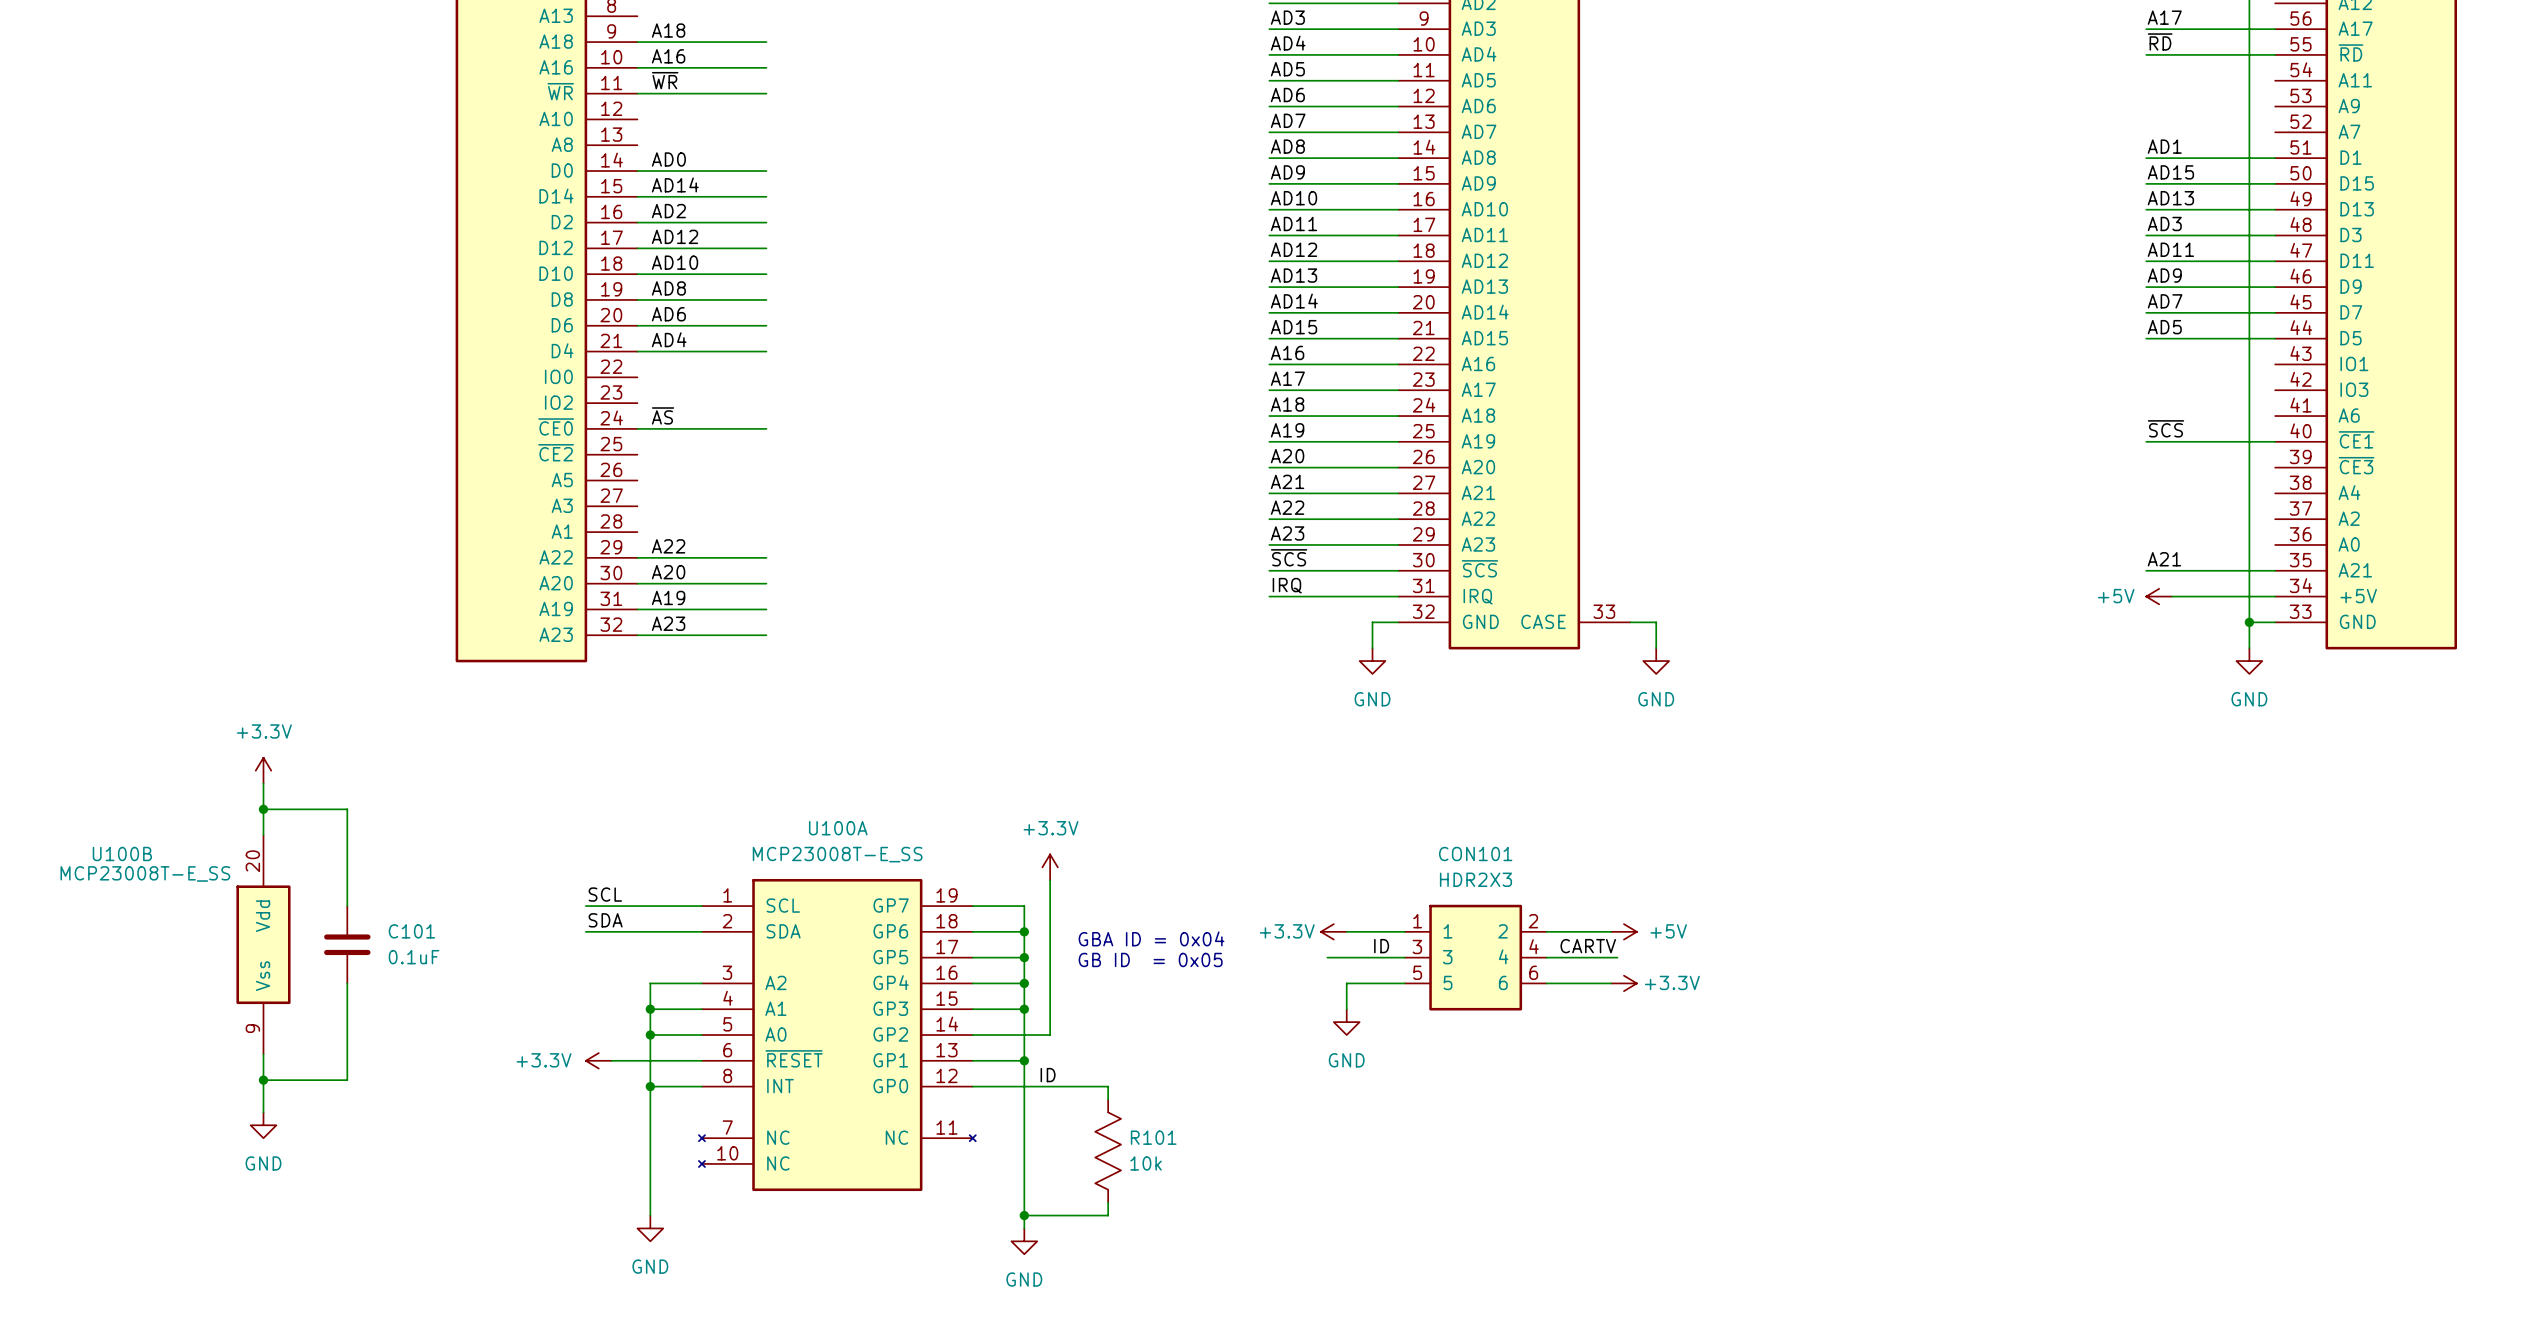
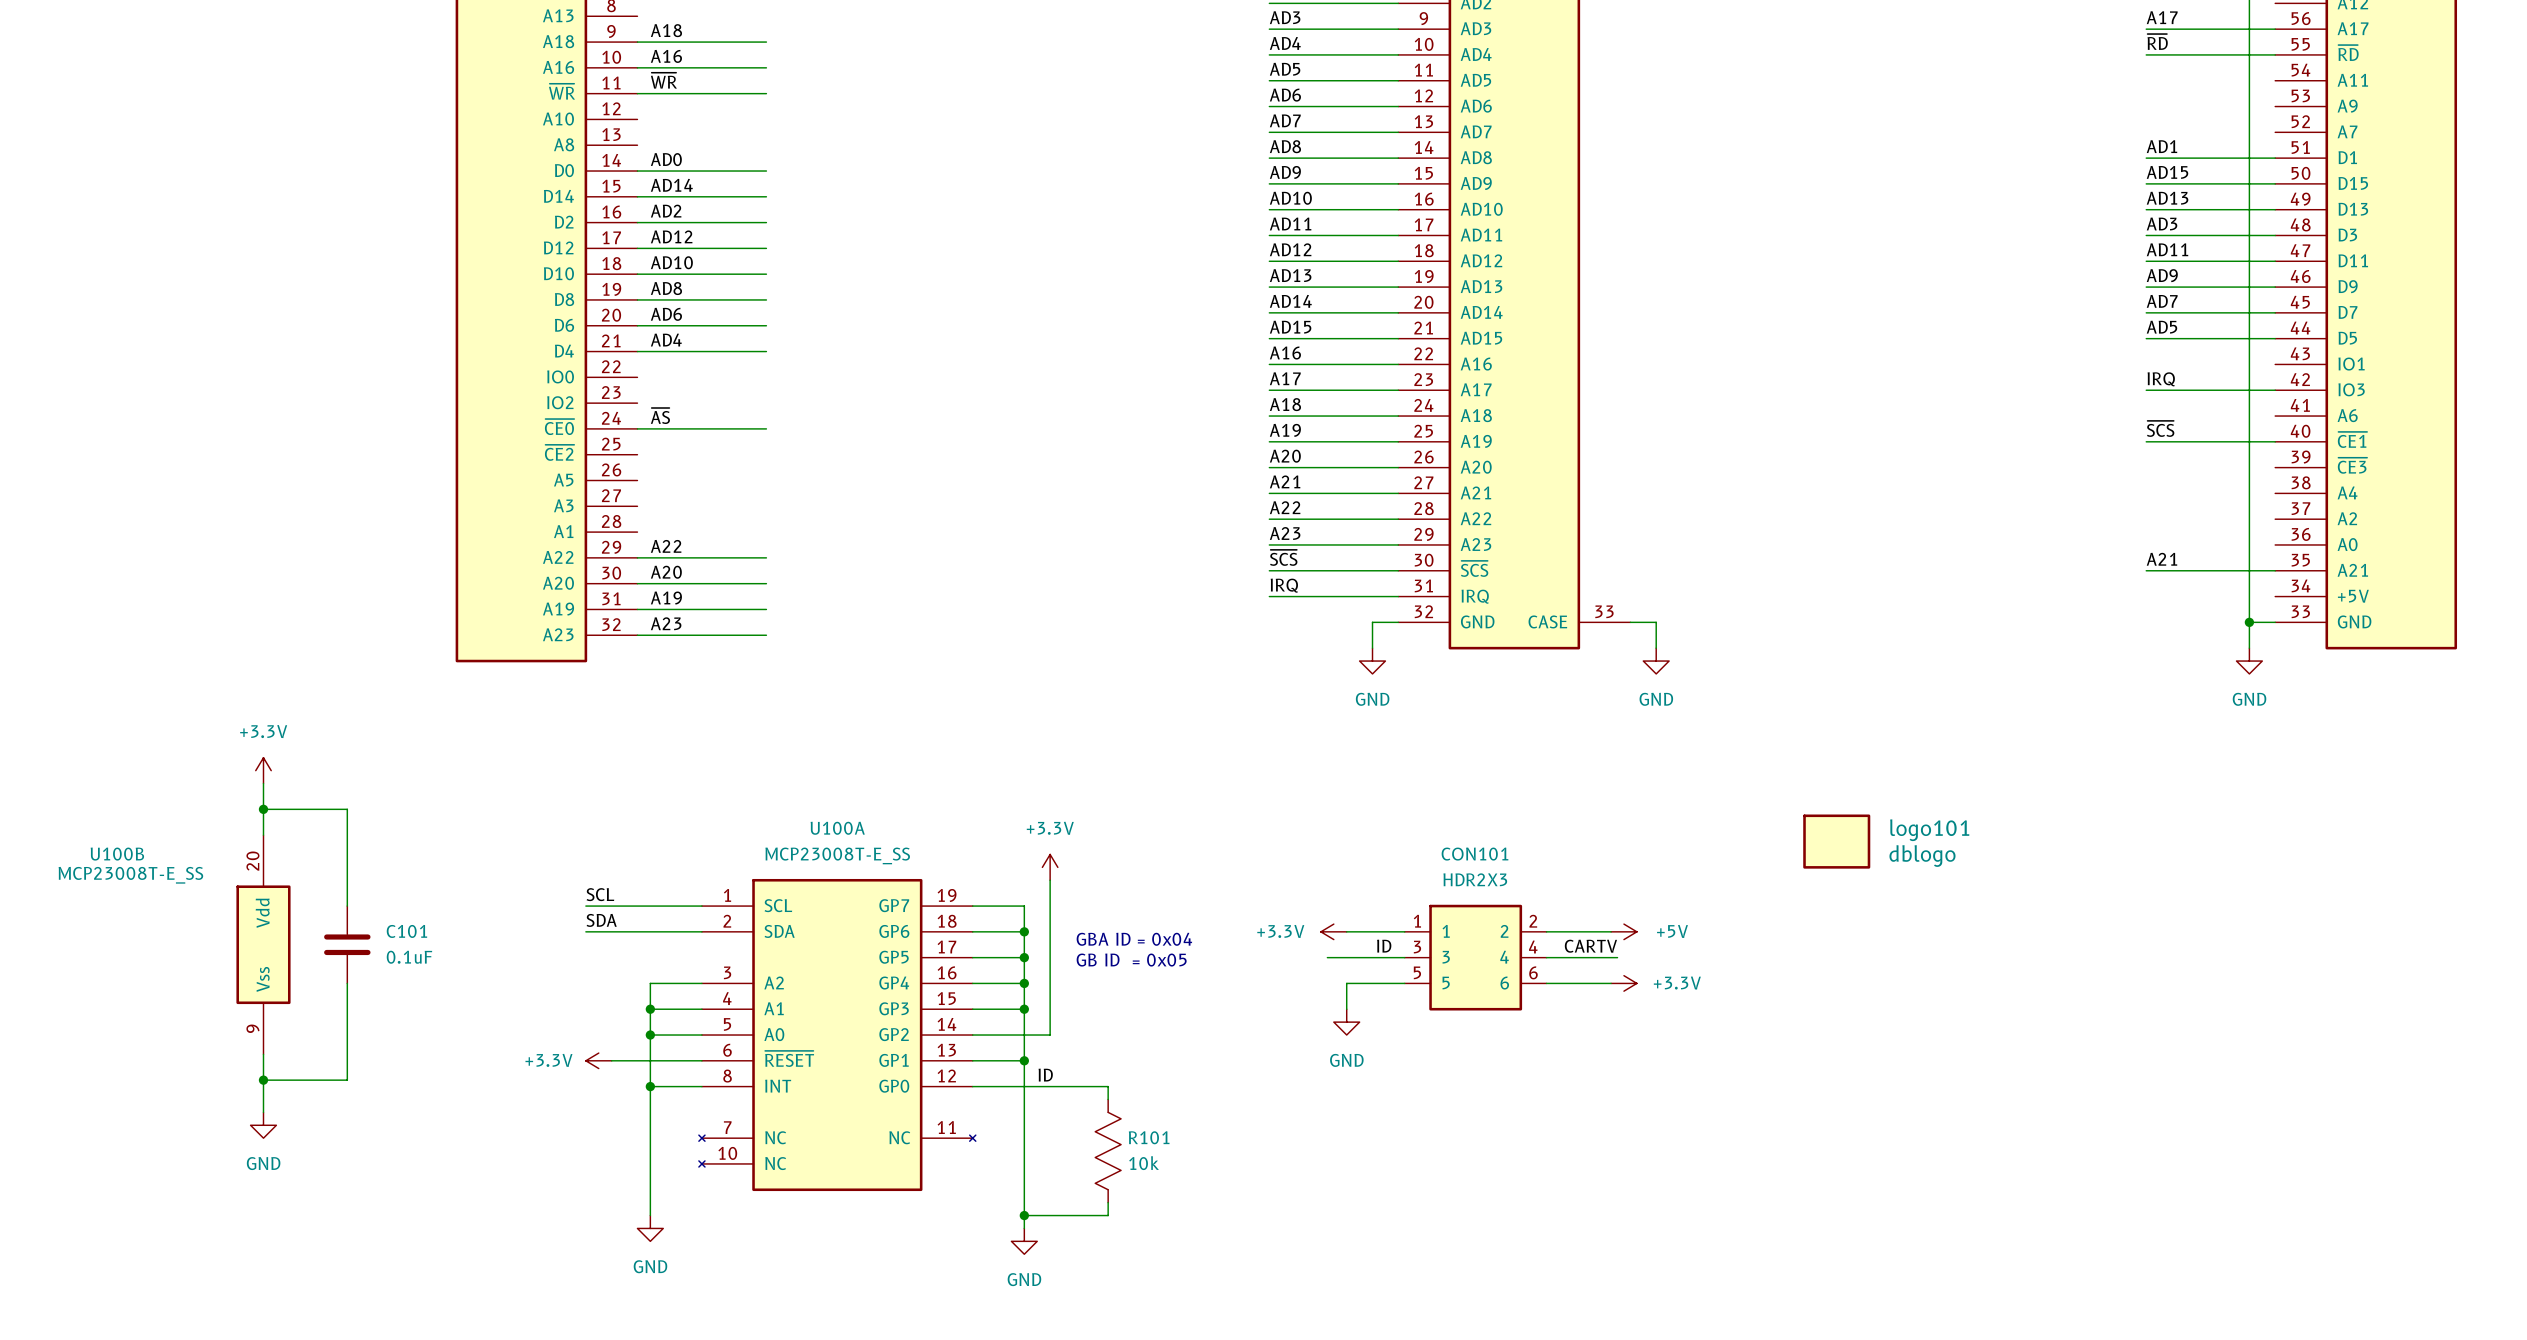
label: none -> IRQ (2161, 379)
wire: none -> (2146, 390) (2275, 390)
power symbol: +5V (2159, 596) -> none
wire: (2172, 596) (2275, 596) -> none
logo101: none -> dblogo (1836, 841)

